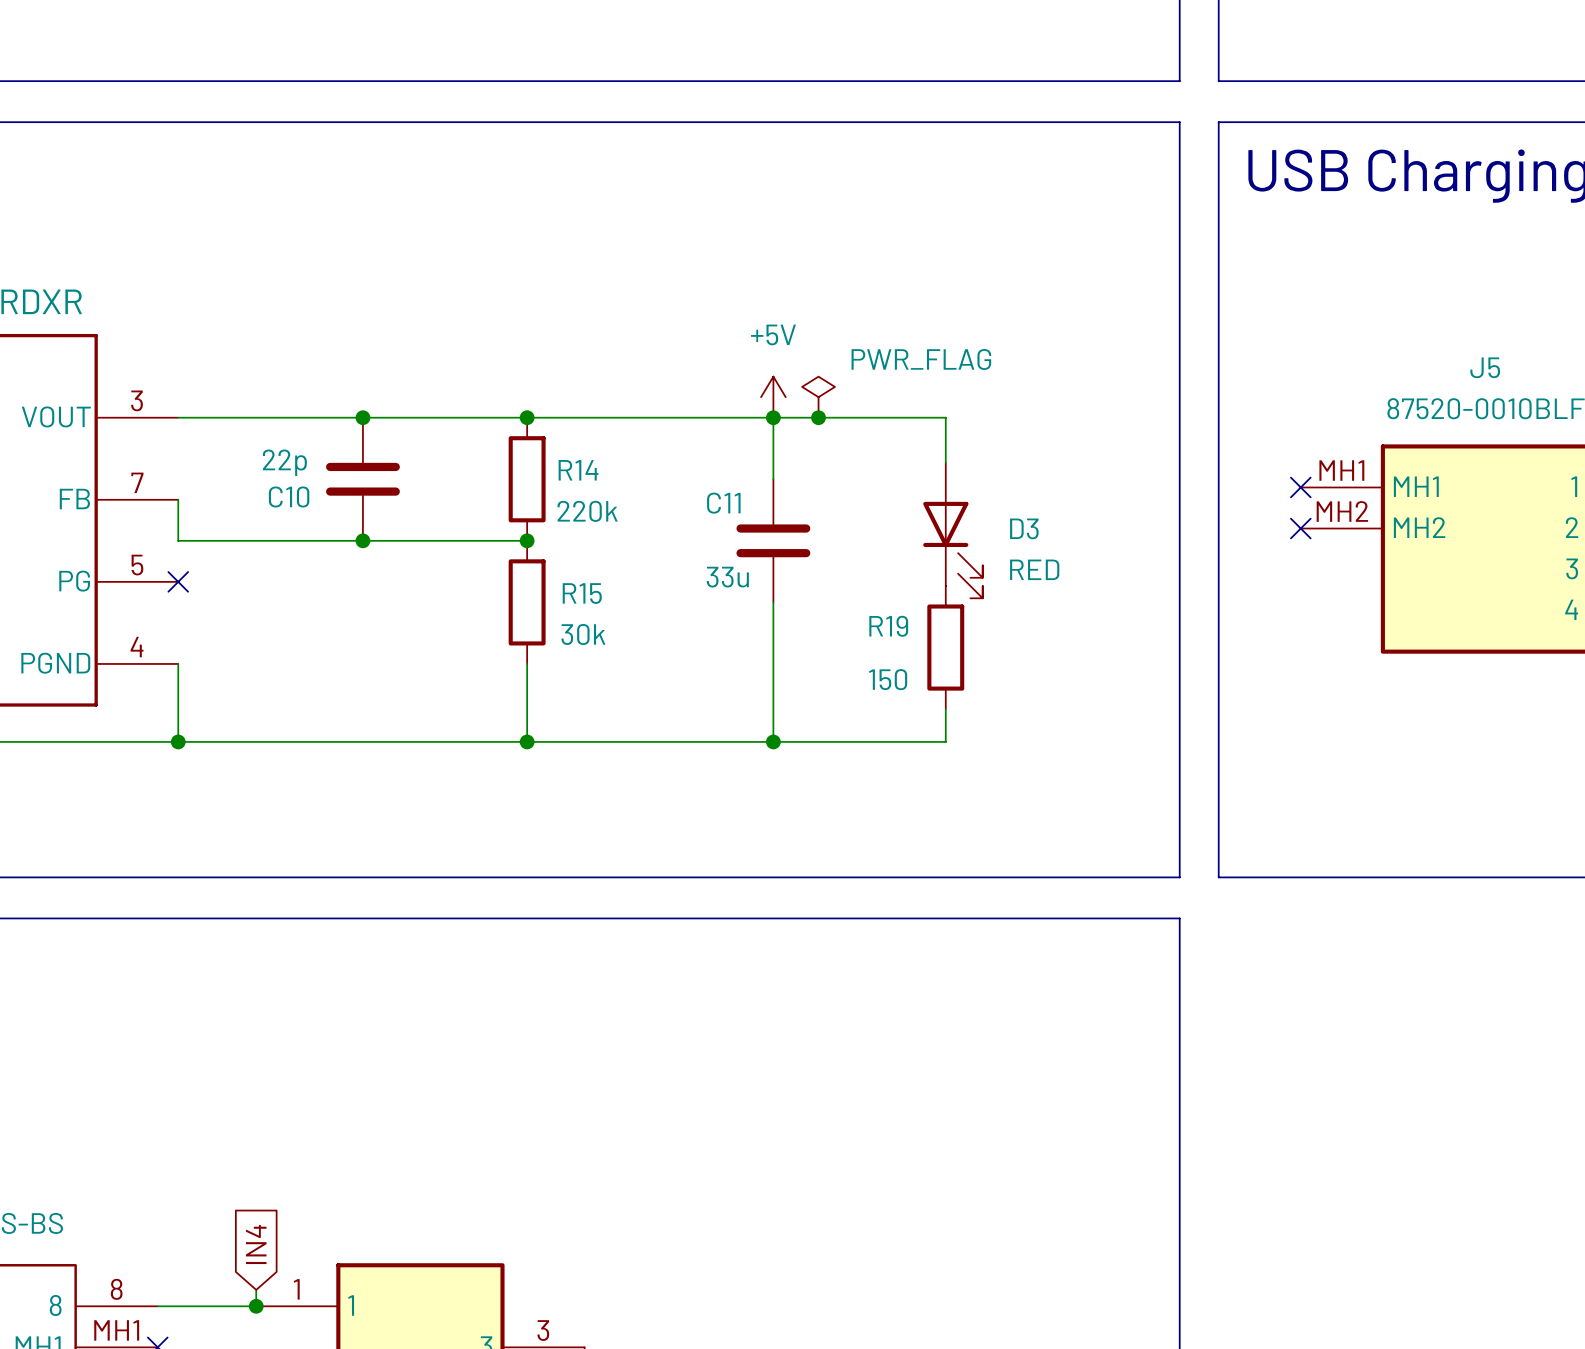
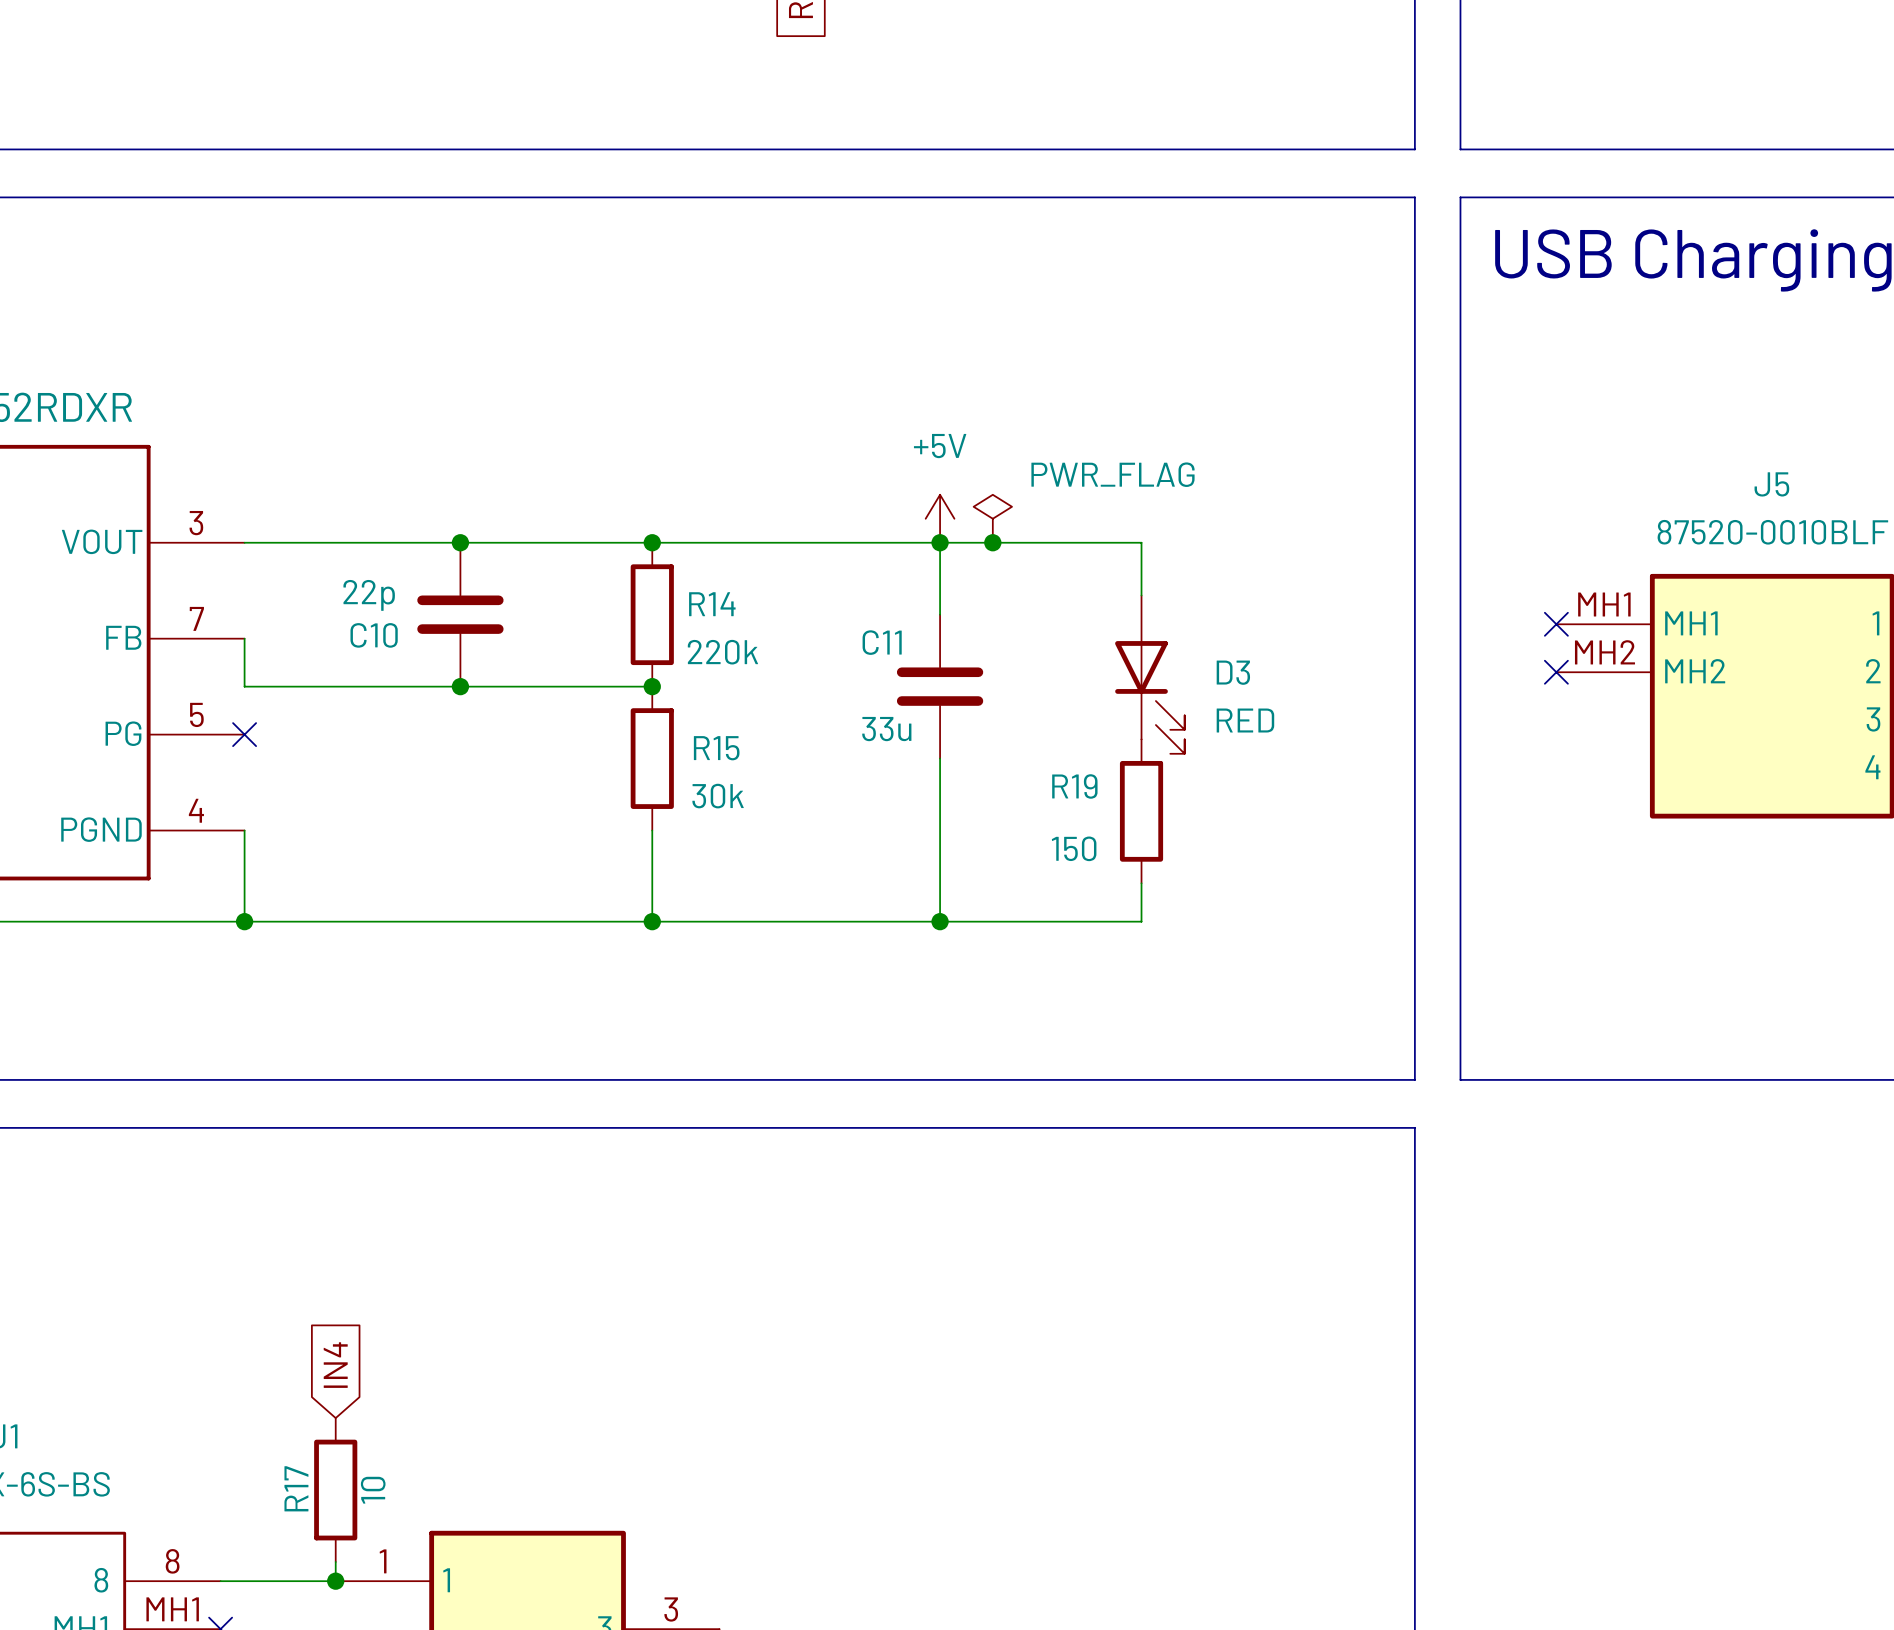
R17: none -> 10 (335, 1490)
global label position: IN4 (256, 1244) -> IN4 (335, 1365)

